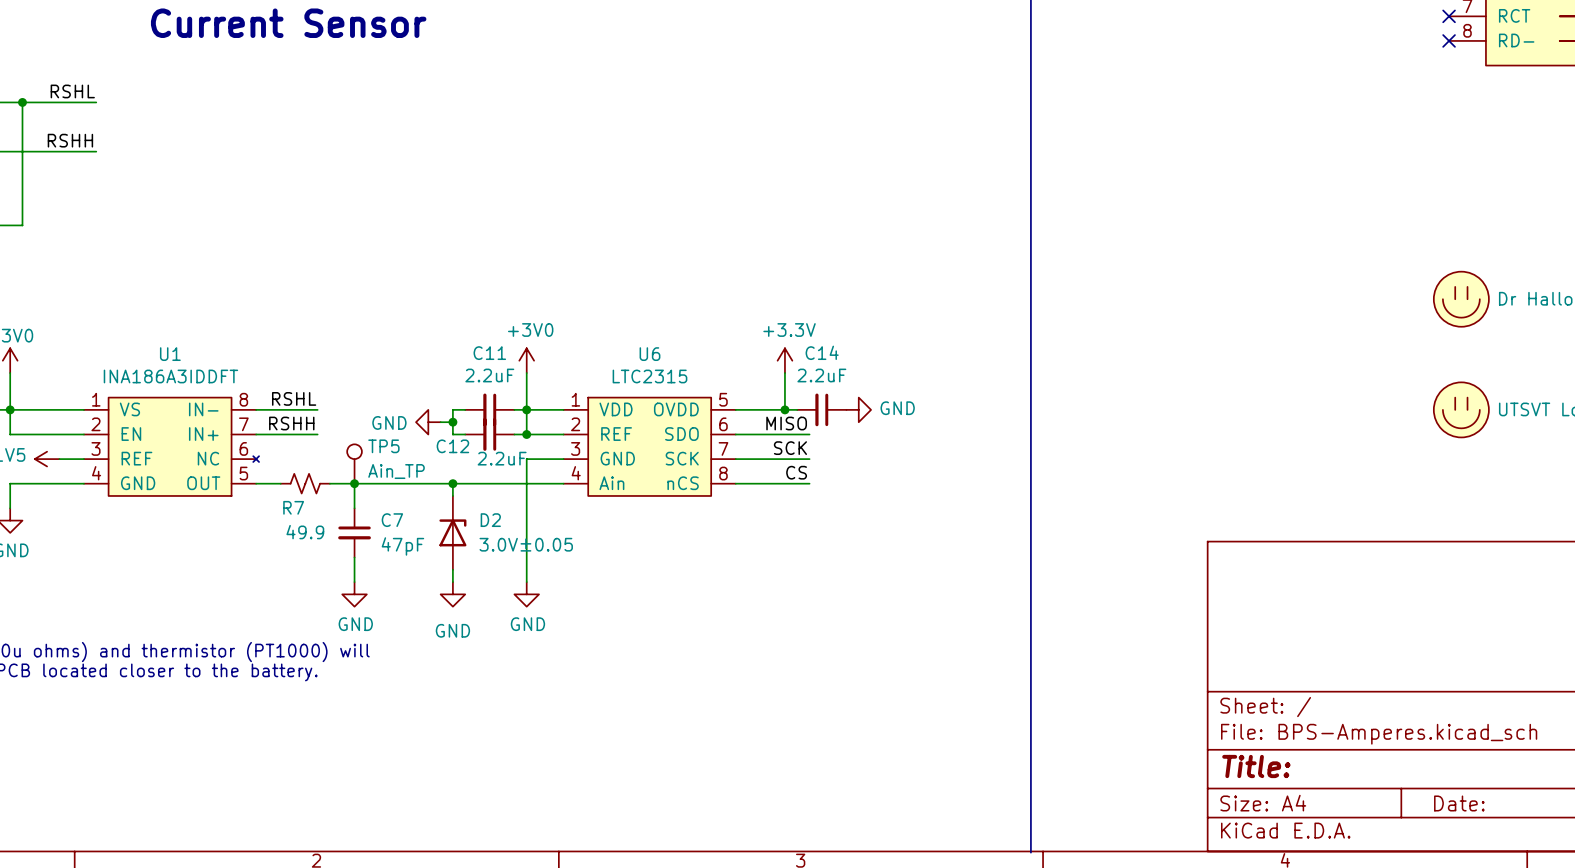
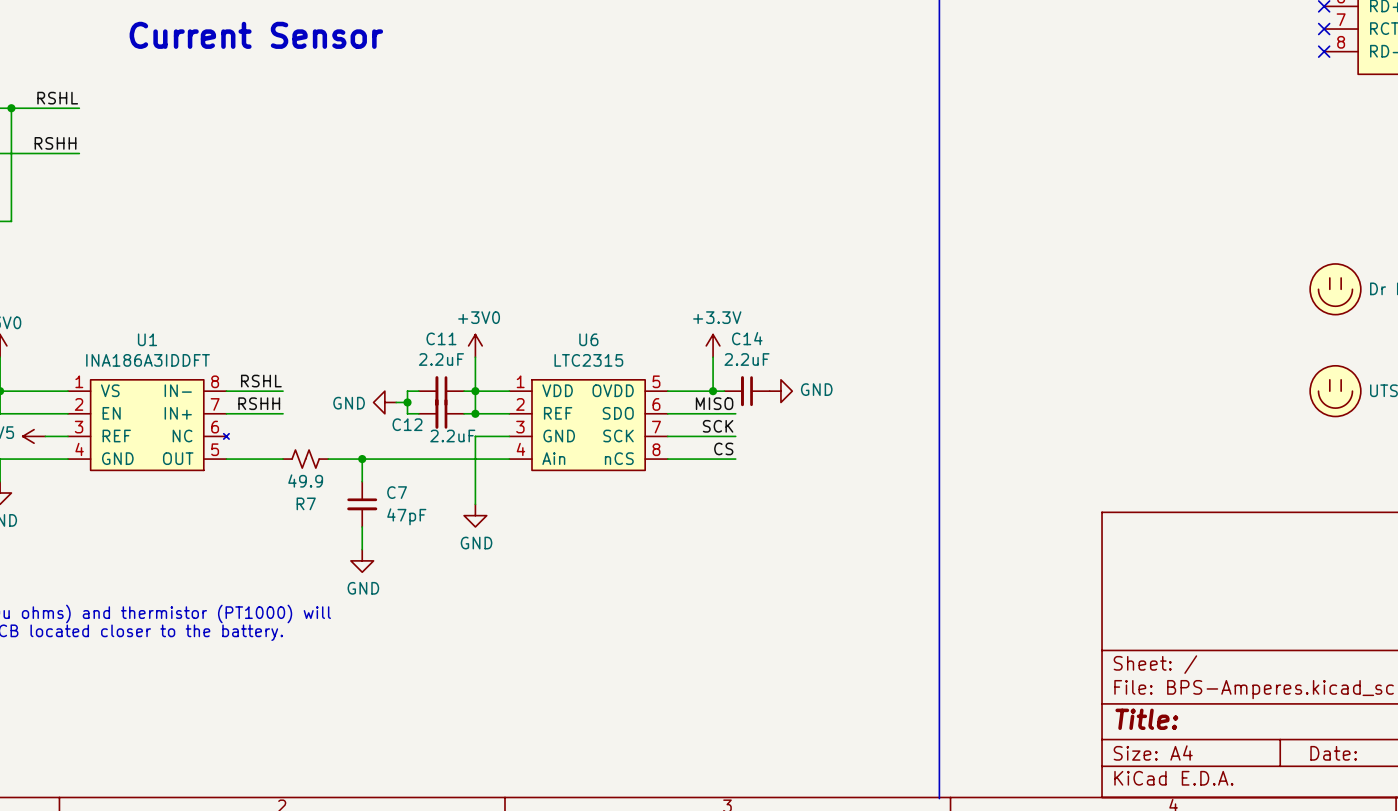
TP5: Ain_TP (354, 464) -> none
R7 position: (305, 483) -> (305, 459)
wire: (329, 483) (366, 483) -> (249, 459) (283, 459)
wire: (354, 483) (354, 508) -> (362, 459) (362, 481)
junction: (354, 483) -> none
junction: none -> (362, 459)
wire: (452, 483) (452, 495) -> none
junction: (452, 483) -> none
R7 name position: R7 (293, 507) -> R7 (306, 503)
R7 value position: 49.9 (305, 532) -> 49.9 (305, 480)
C7 position: (354, 532) -> (362, 504)
D2: 3.0V±0.05 (452, 532) -> none
wire: (526, 532) (526, 582) -> none
power symbol: none -> GND (475, 515)
wire: (354, 557) (354, 582) -> (362, 526) (362, 549)
wire: (452, 569) (452, 582) -> none
power symbol: GND (354, 594) -> none
power symbol: none -> GND (362, 560)
power symbol: GND (452, 594) -> none
power symbol: GND (526, 594) -> none

